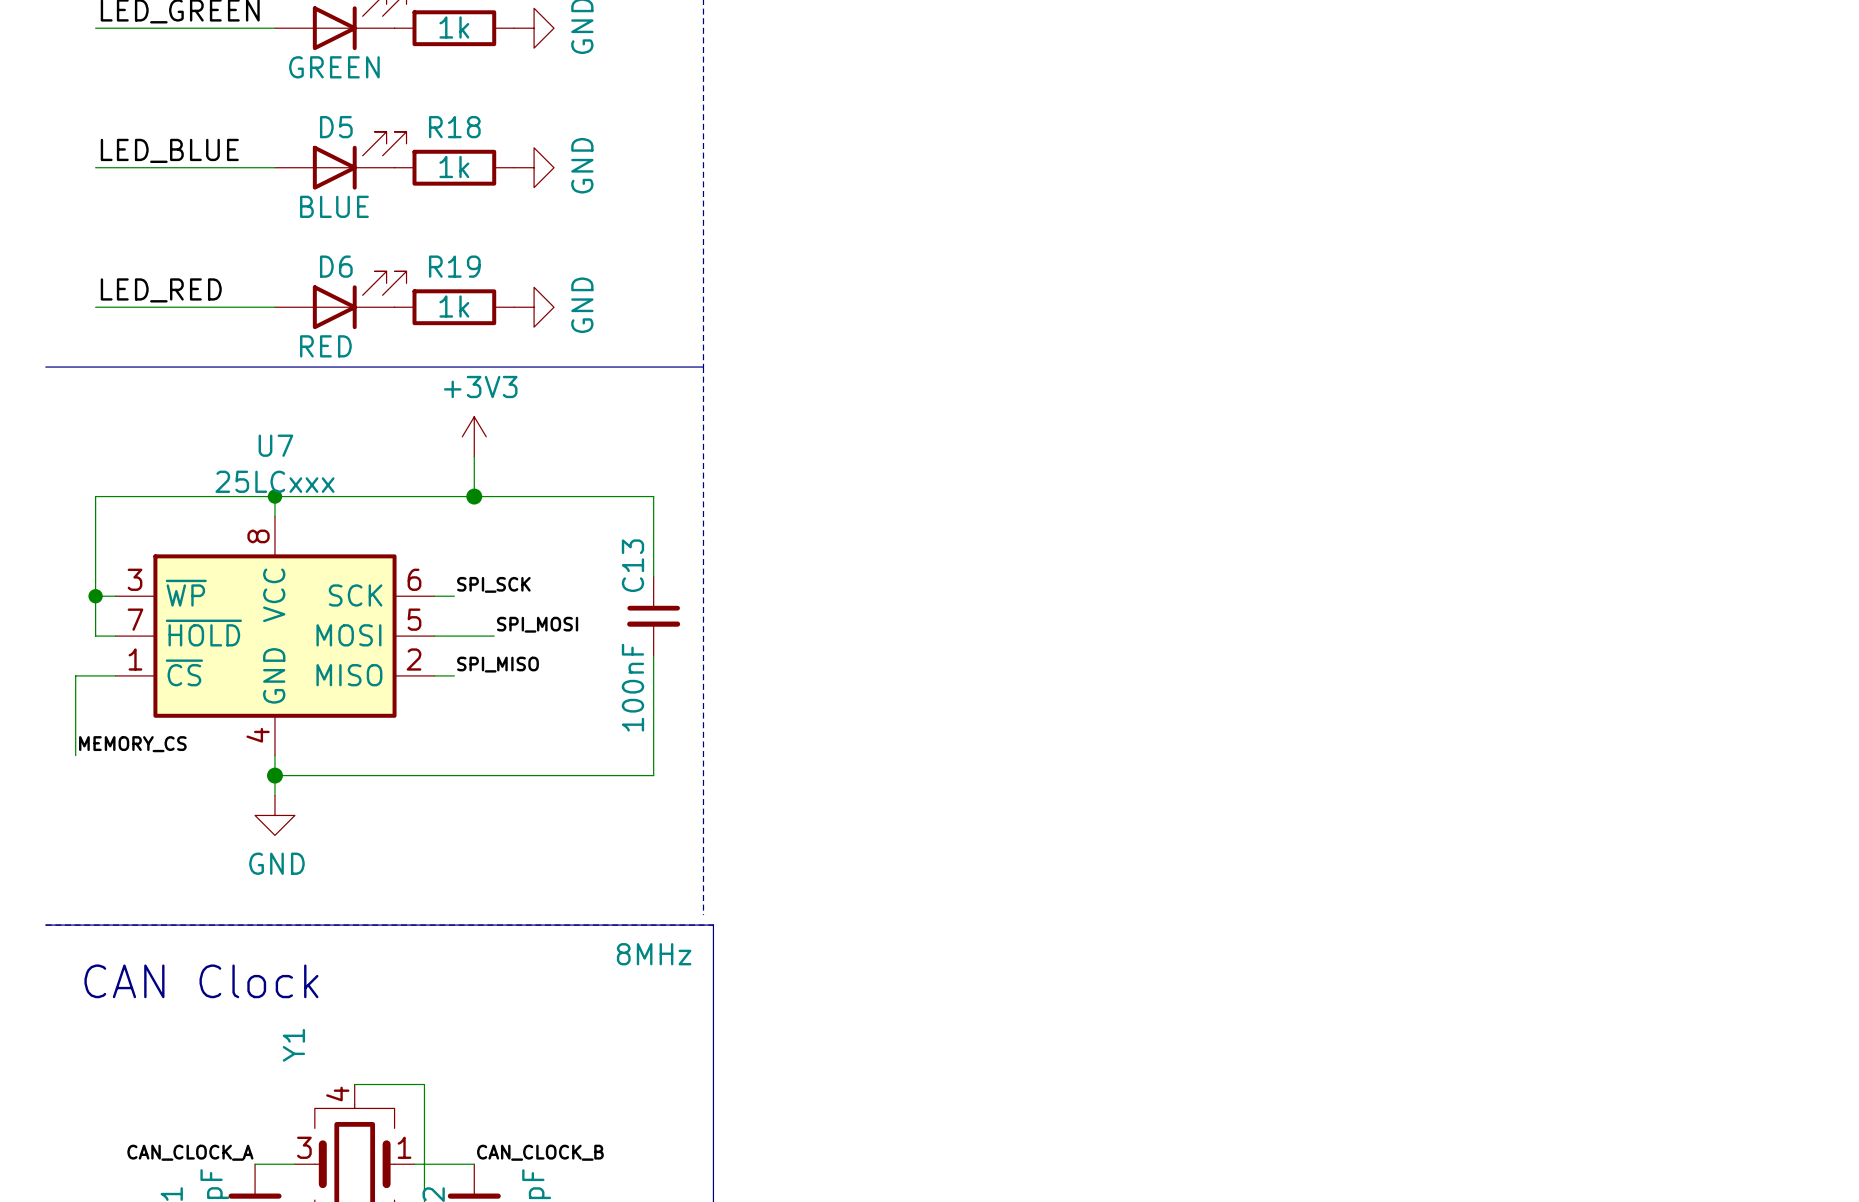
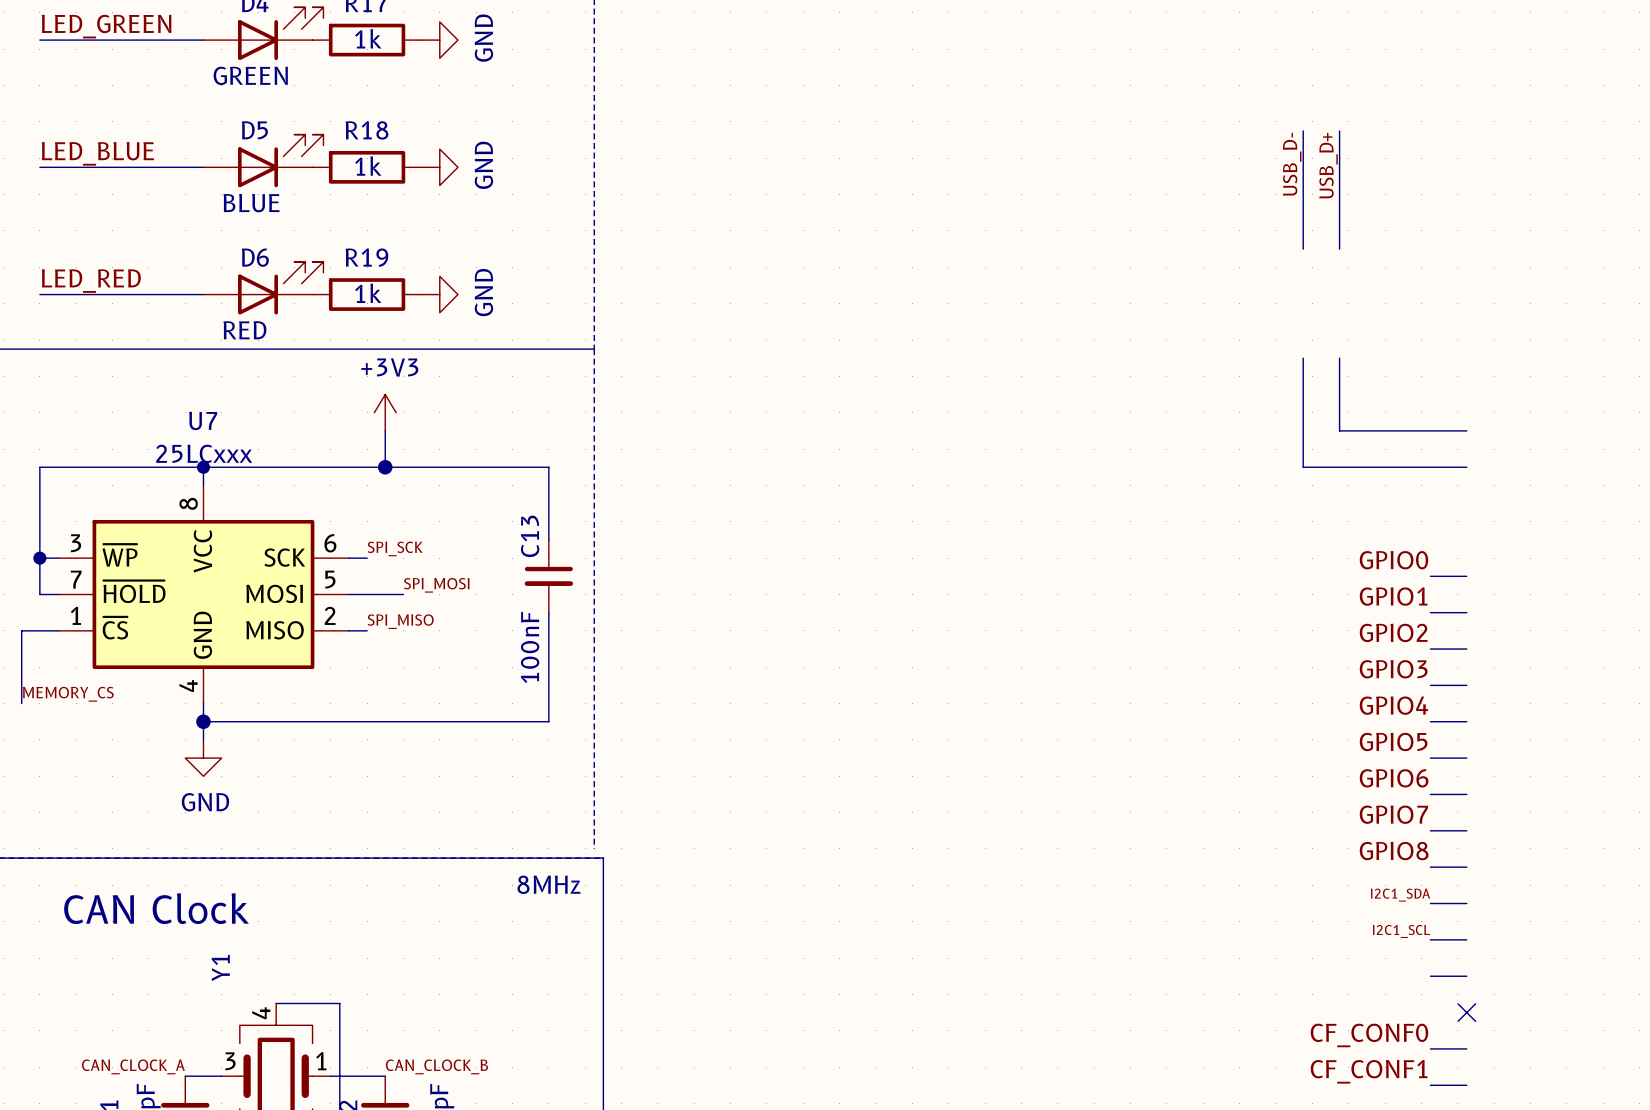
wire: none -> (1303, 130) (1303, 249)
wire: none -> (1339, 130) (1339, 249)
label: none -> USB_D- (1292, 164)
label: none -> USB_D+ (1328, 165)
wire: none -> (1303, 358) (1303, 467) (1466, 467)
wire: none -> (1339, 358) (1339, 430) (1466, 430)
label: none -> GPIO0 (1393, 560)
wire: none -> (1430, 576) (1466, 576)
label: none -> GPIO1 (1393, 596)
wire: none -> (1430, 612) (1466, 612)
label: none -> GPIO2 (1393, 632)
wire: none -> (1430, 649) (1466, 649)
label: none -> GPIO3 (1393, 669)
wire: none -> (1430, 685) (1466, 685)
label: none -> GPIO4 (1393, 705)
wire: none -> (1430, 721) (1466, 721)
label: none -> GPIO5 (1393, 741)
wire: none -> (1430, 758) (1466, 758)
label: none -> GPIO6 (1394, 778)
wire: none -> (1430, 794) (1466, 794)
label: none -> GPIO7 (1393, 814)
wire: none -> (1430, 830) (1466, 830)
label: none -> GPIO8 (1394, 851)
wire: none -> (1430, 867) (1466, 867)
label: none -> I2C1_SDA (1400, 895)
wire: none -> (1430, 903) (1466, 903)
label: none -> I2C1_SCL (1401, 931)
wire: none -> (1430, 939) (1466, 939)
wire: none -> (1430, 976) (1466, 976)
no-connect mark: none -> (1466, 1012)
label: none -> CF_CONF0 (1369, 1035)
wire: none -> (1430, 1048) (1466, 1048)
label: none -> CF_CONF1 (1369, 1071)
wire: none -> (1430, 1085) (1466, 1085)

